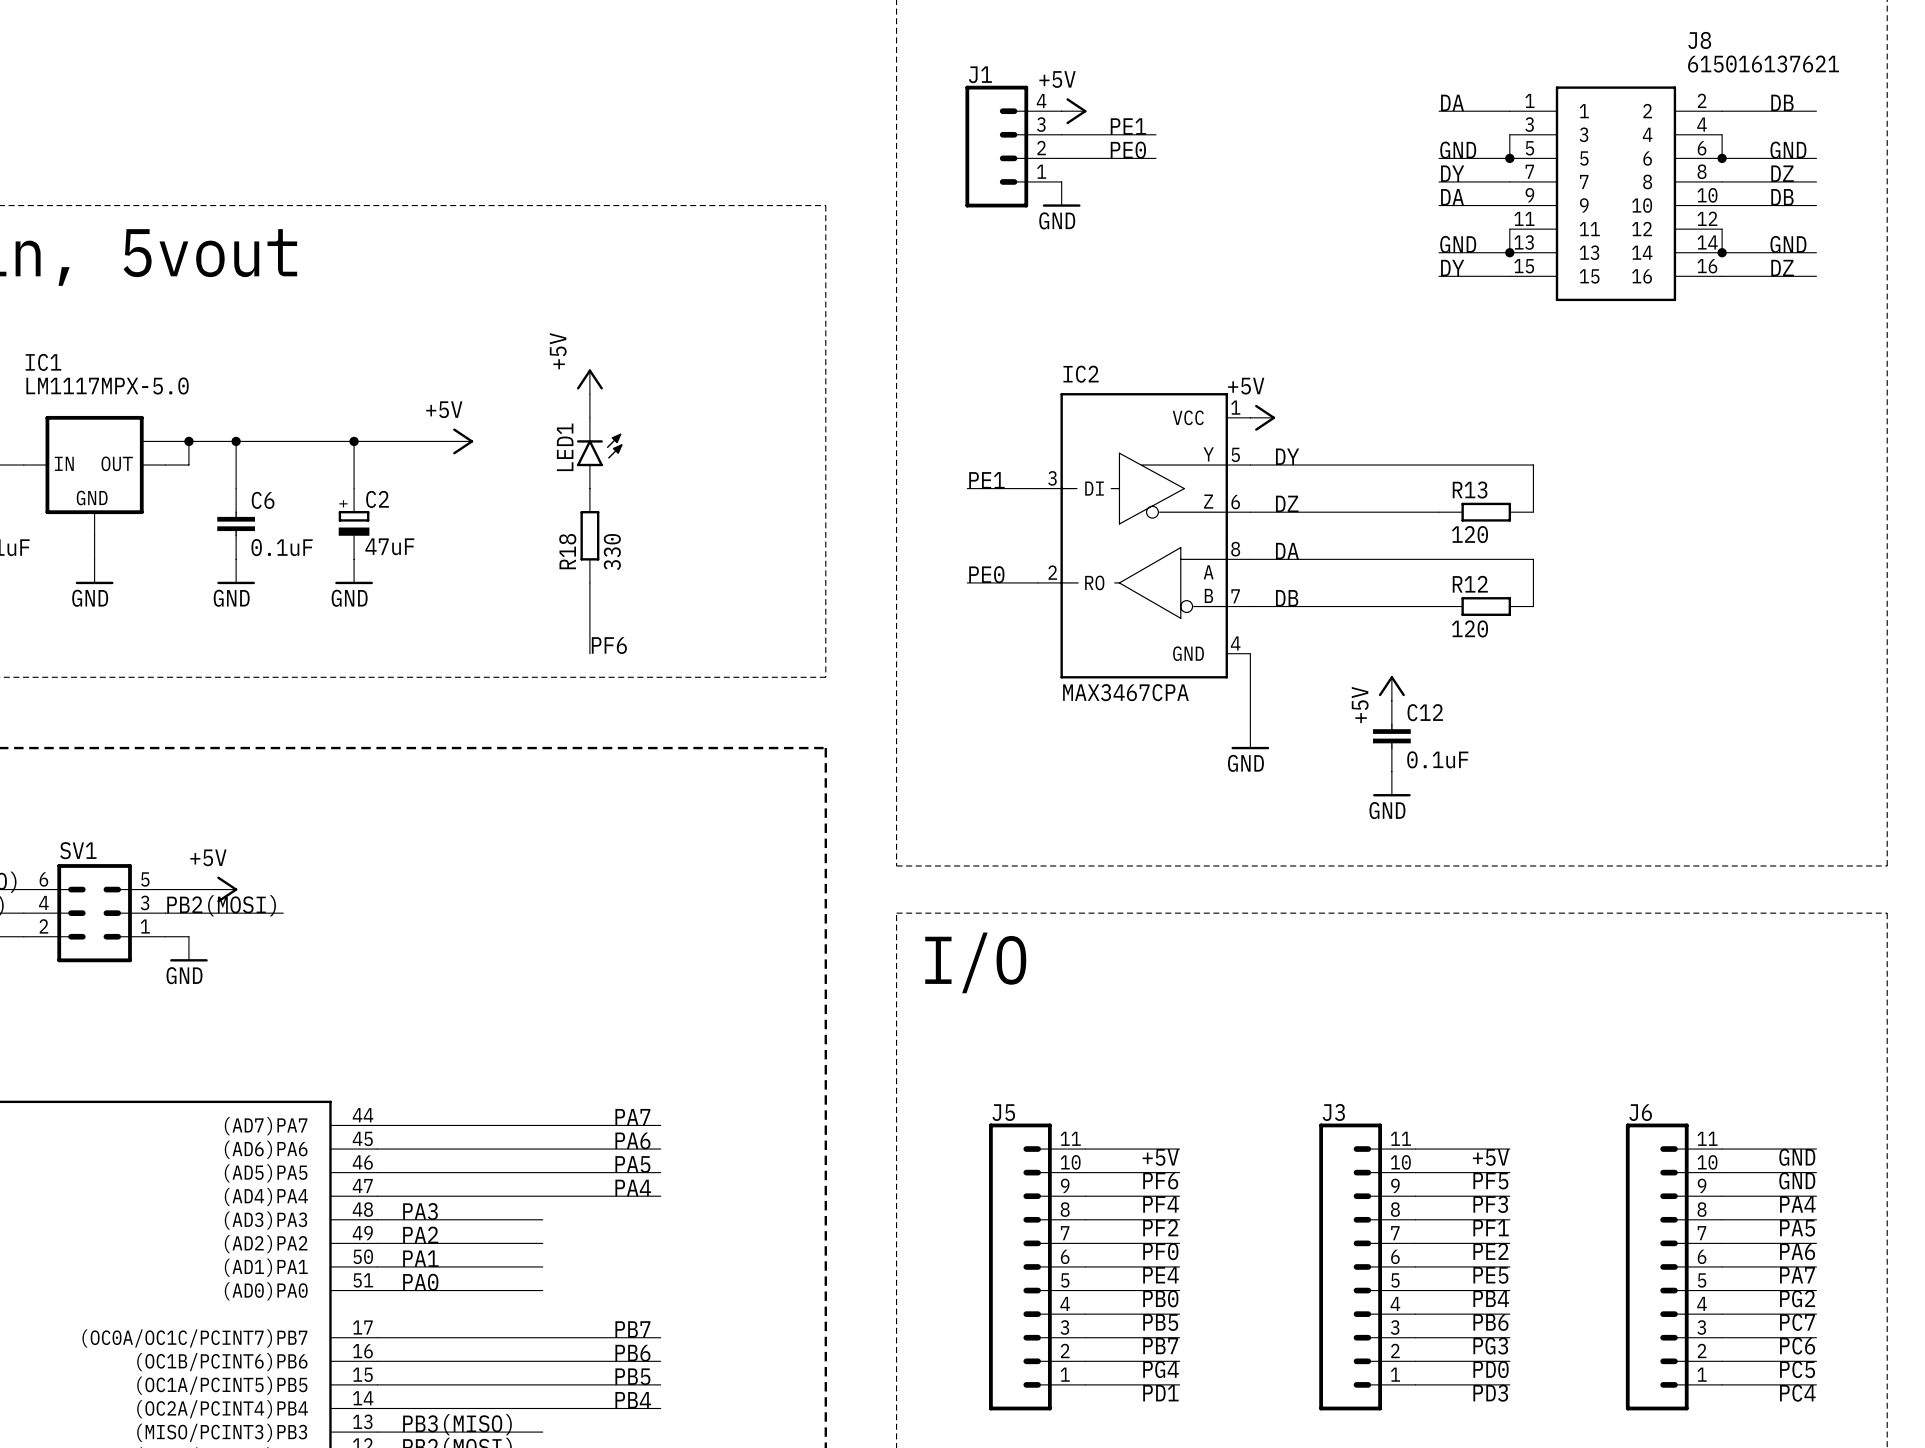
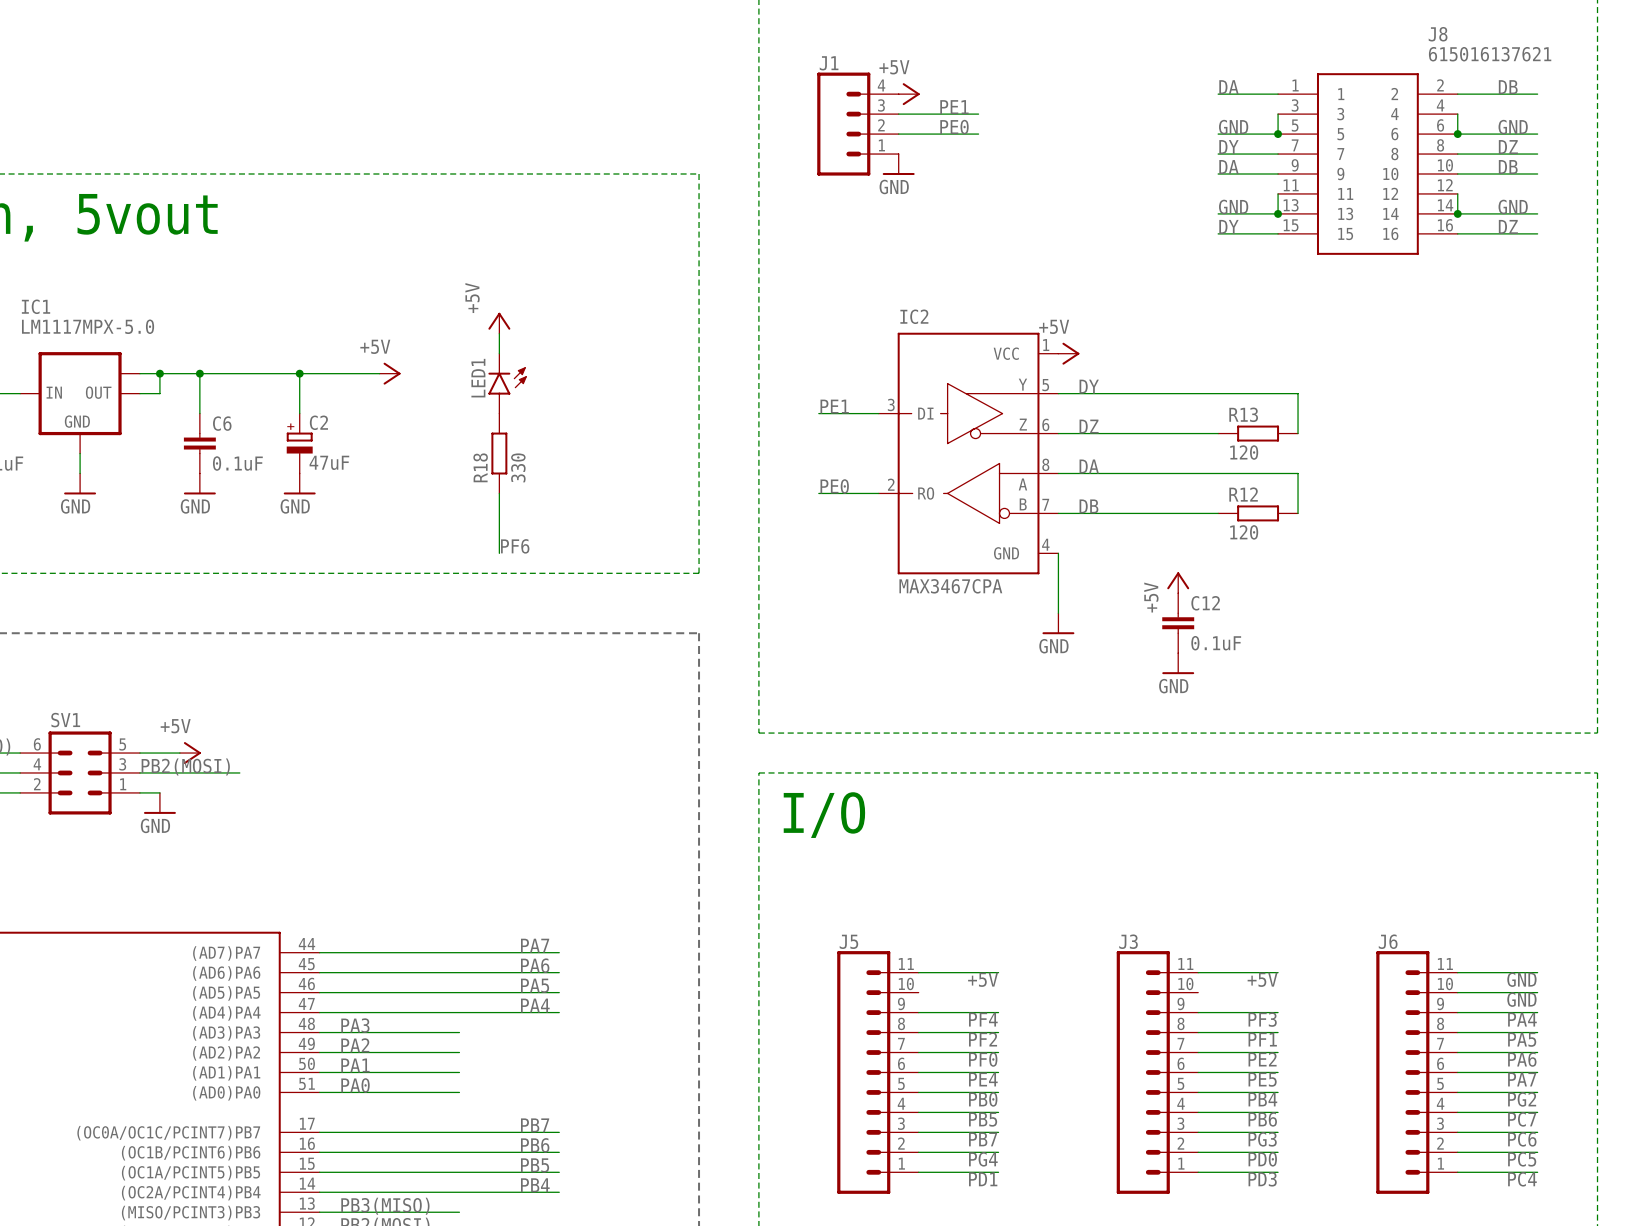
wire: (1085, 1172) (1179, 1172) -> none
wire: (1415, 1172) (1509, 1172) -> none
label: PF6 (1160, 1181) -> none
label: PF5 (1490, 1181) -> none

